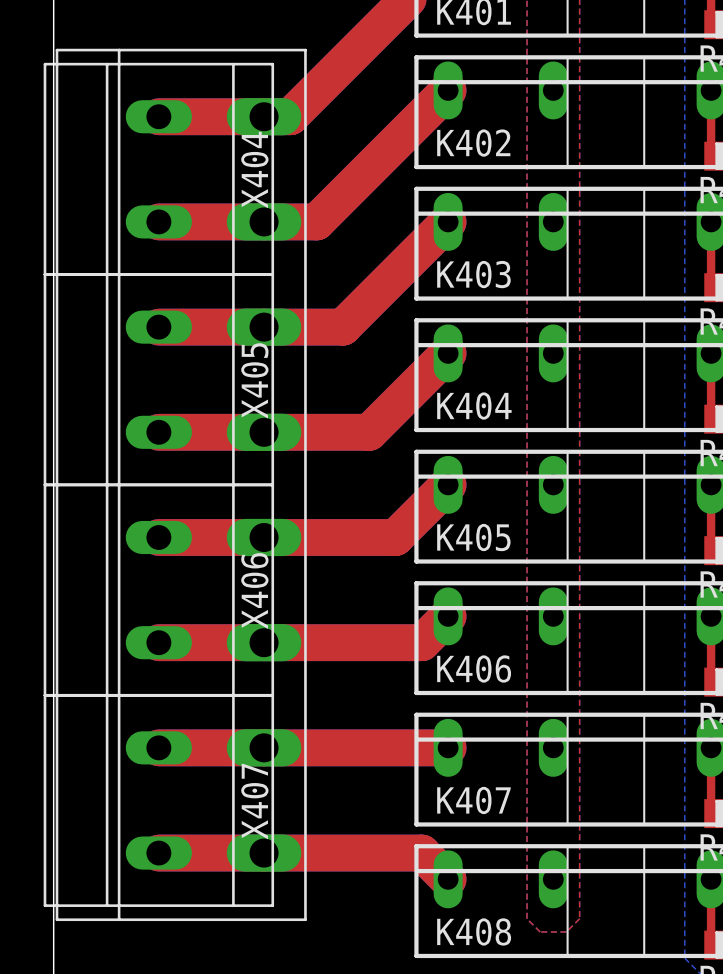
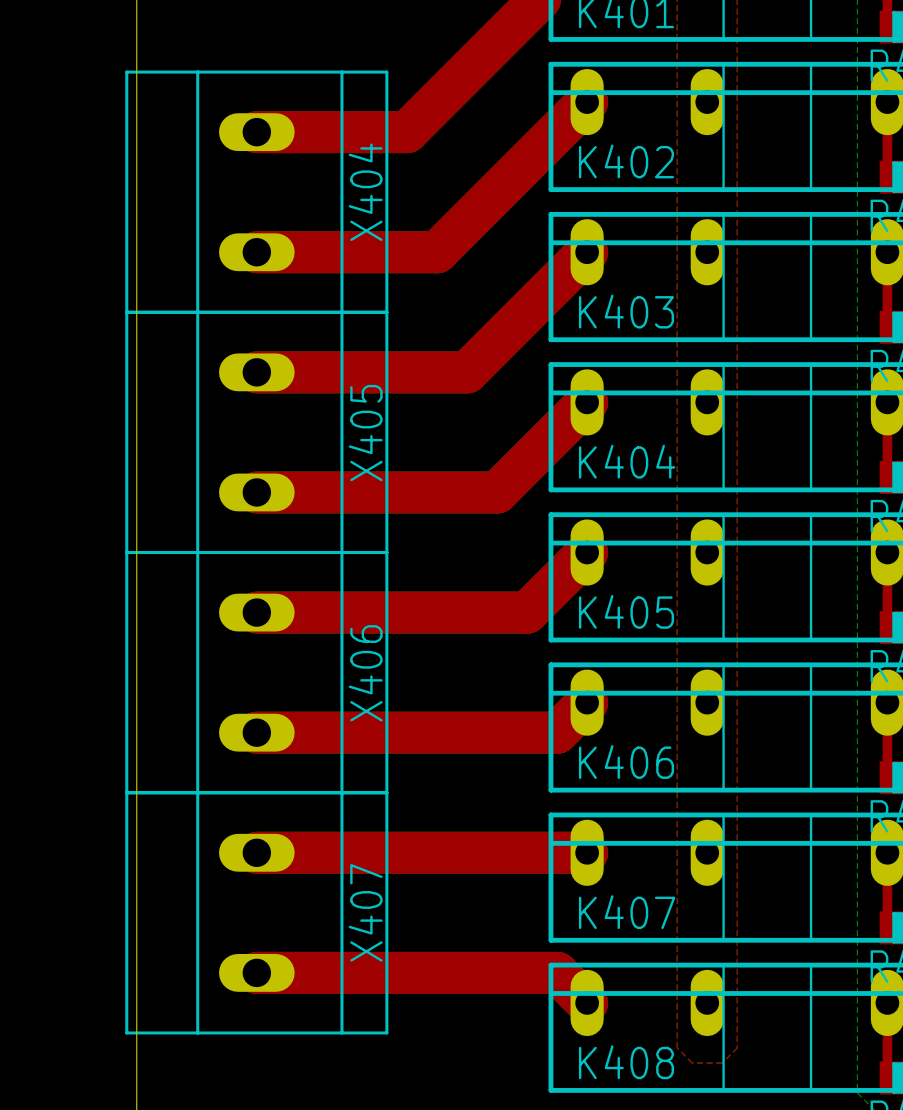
part: (181, 484) -> none

